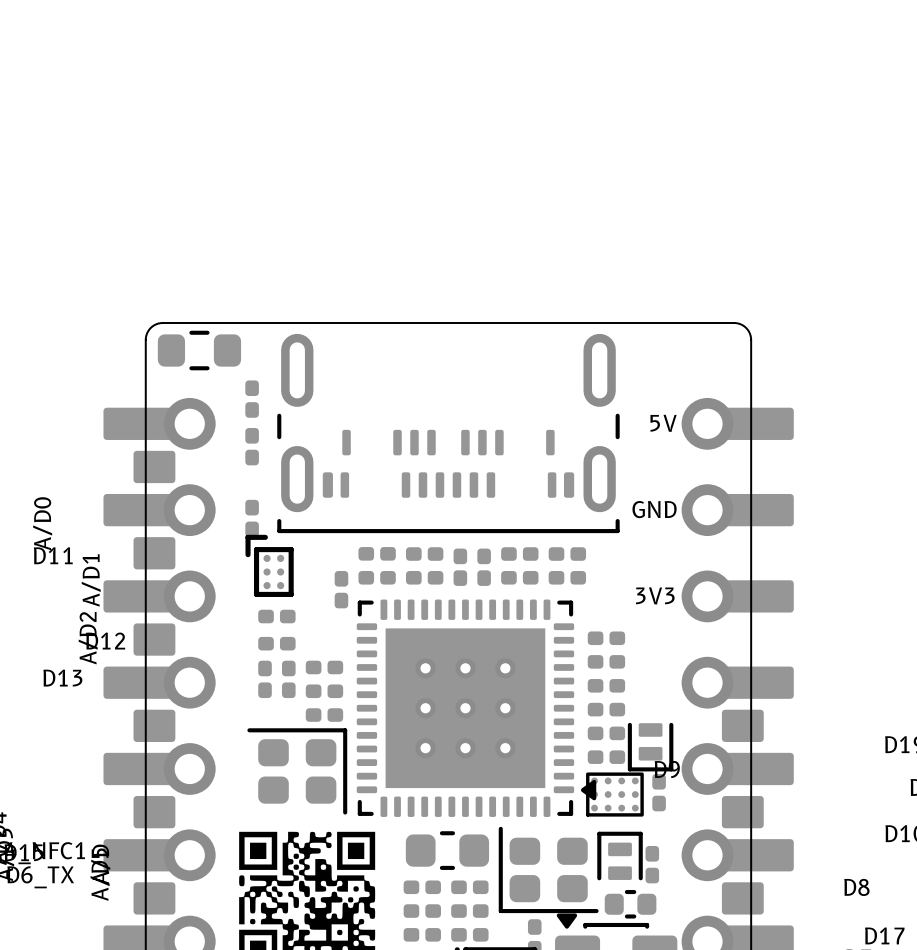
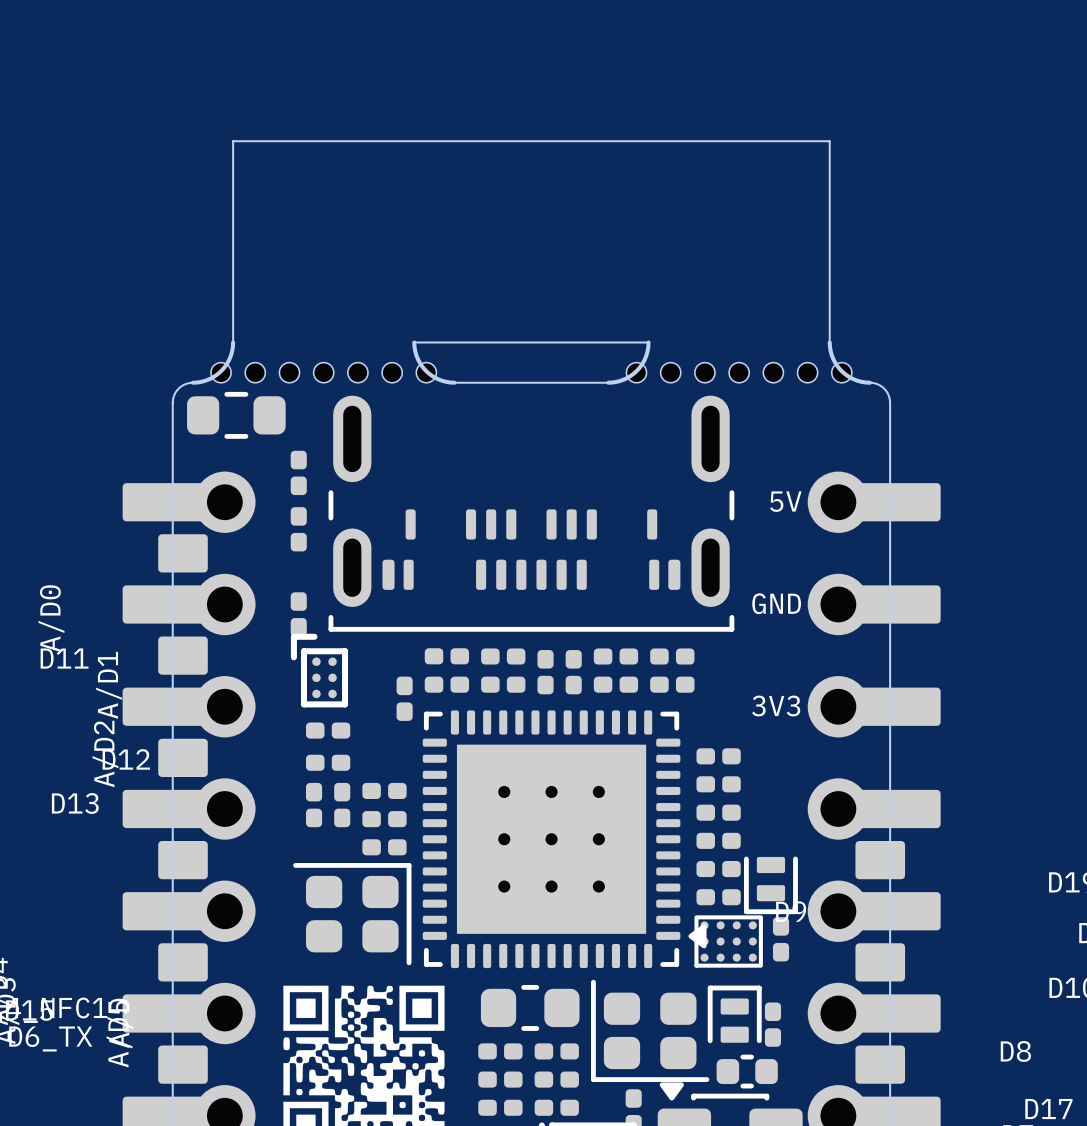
board edge: none -> (233, 342) (233, 141) (829, 141) (829, 342)
board edge: none -> (414, 342) (648, 342)
part: none -> (323, 362)
part: none -> (739, 362)
board edge: (162, 322) (383, 322) -> none
board edge: (513, 322) (734, 322) -> none

